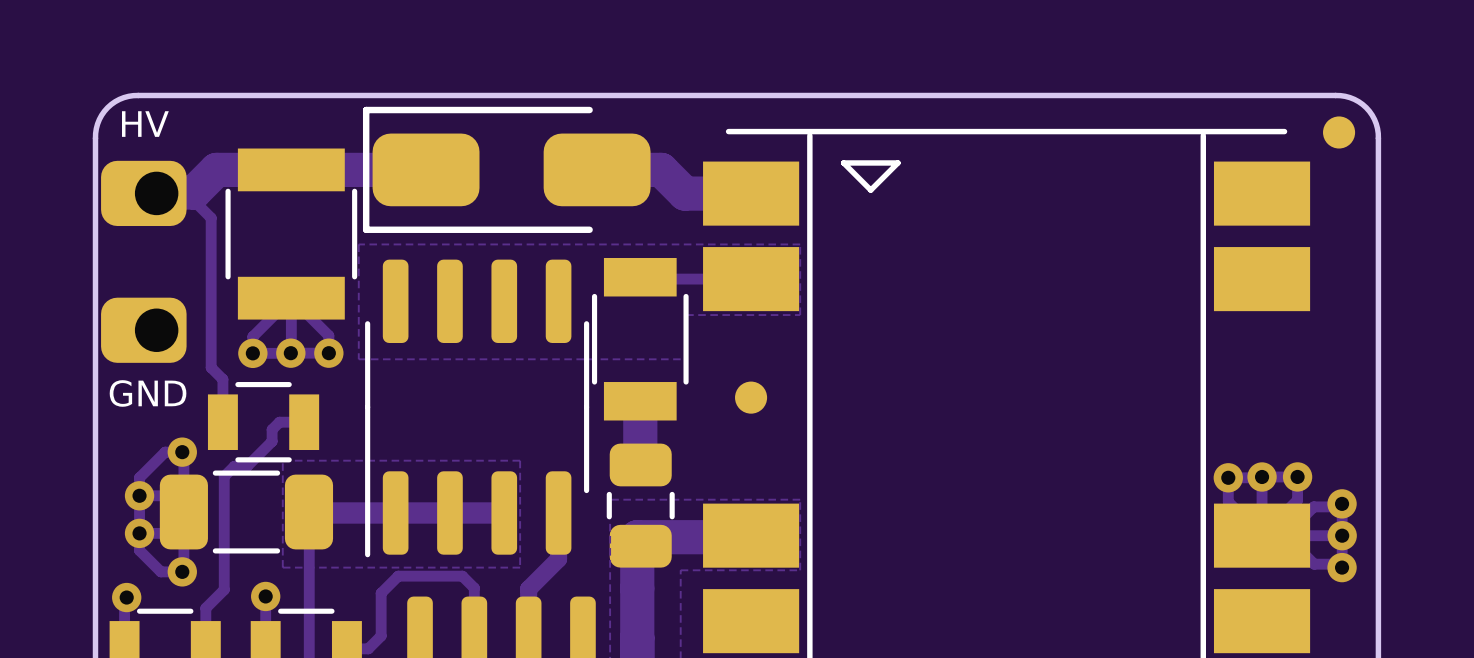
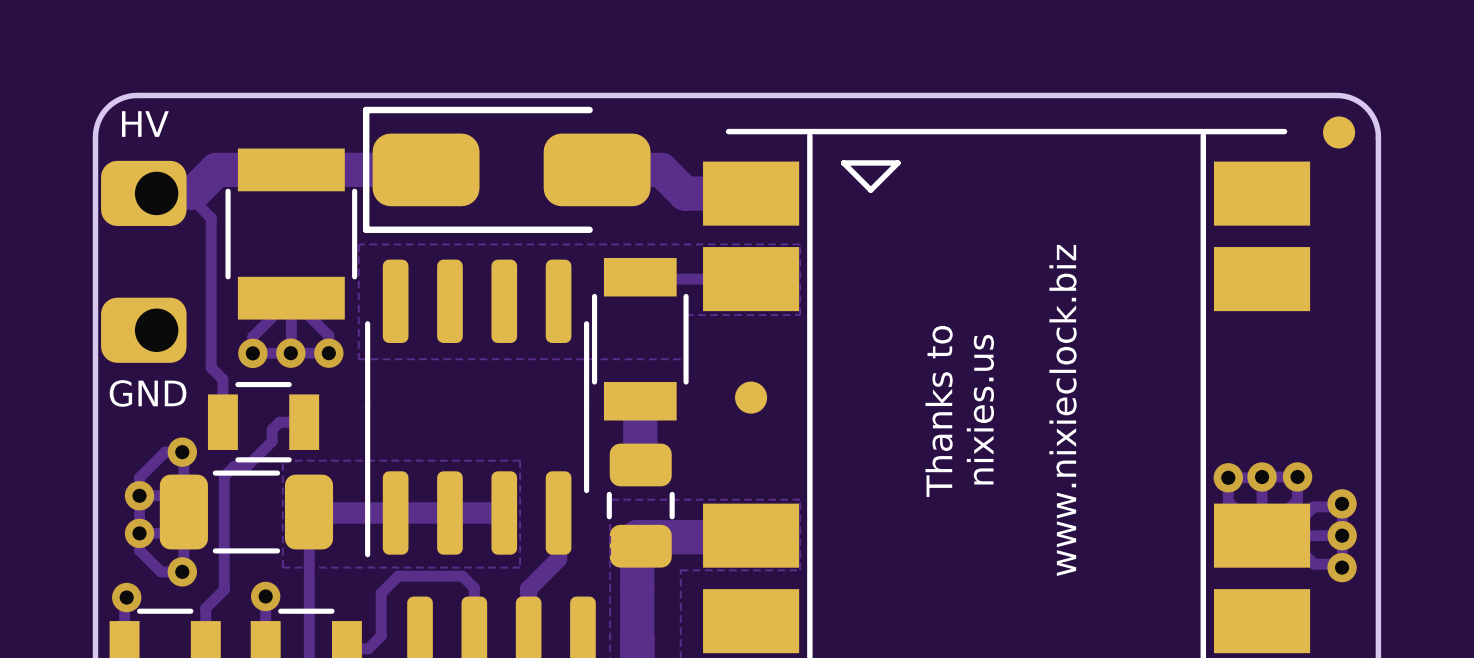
text: none -> nixies.us (980, 409)
text: none -> www.nixieclock.biz (1063, 410)
text: none -> Thanks to (939, 411)

